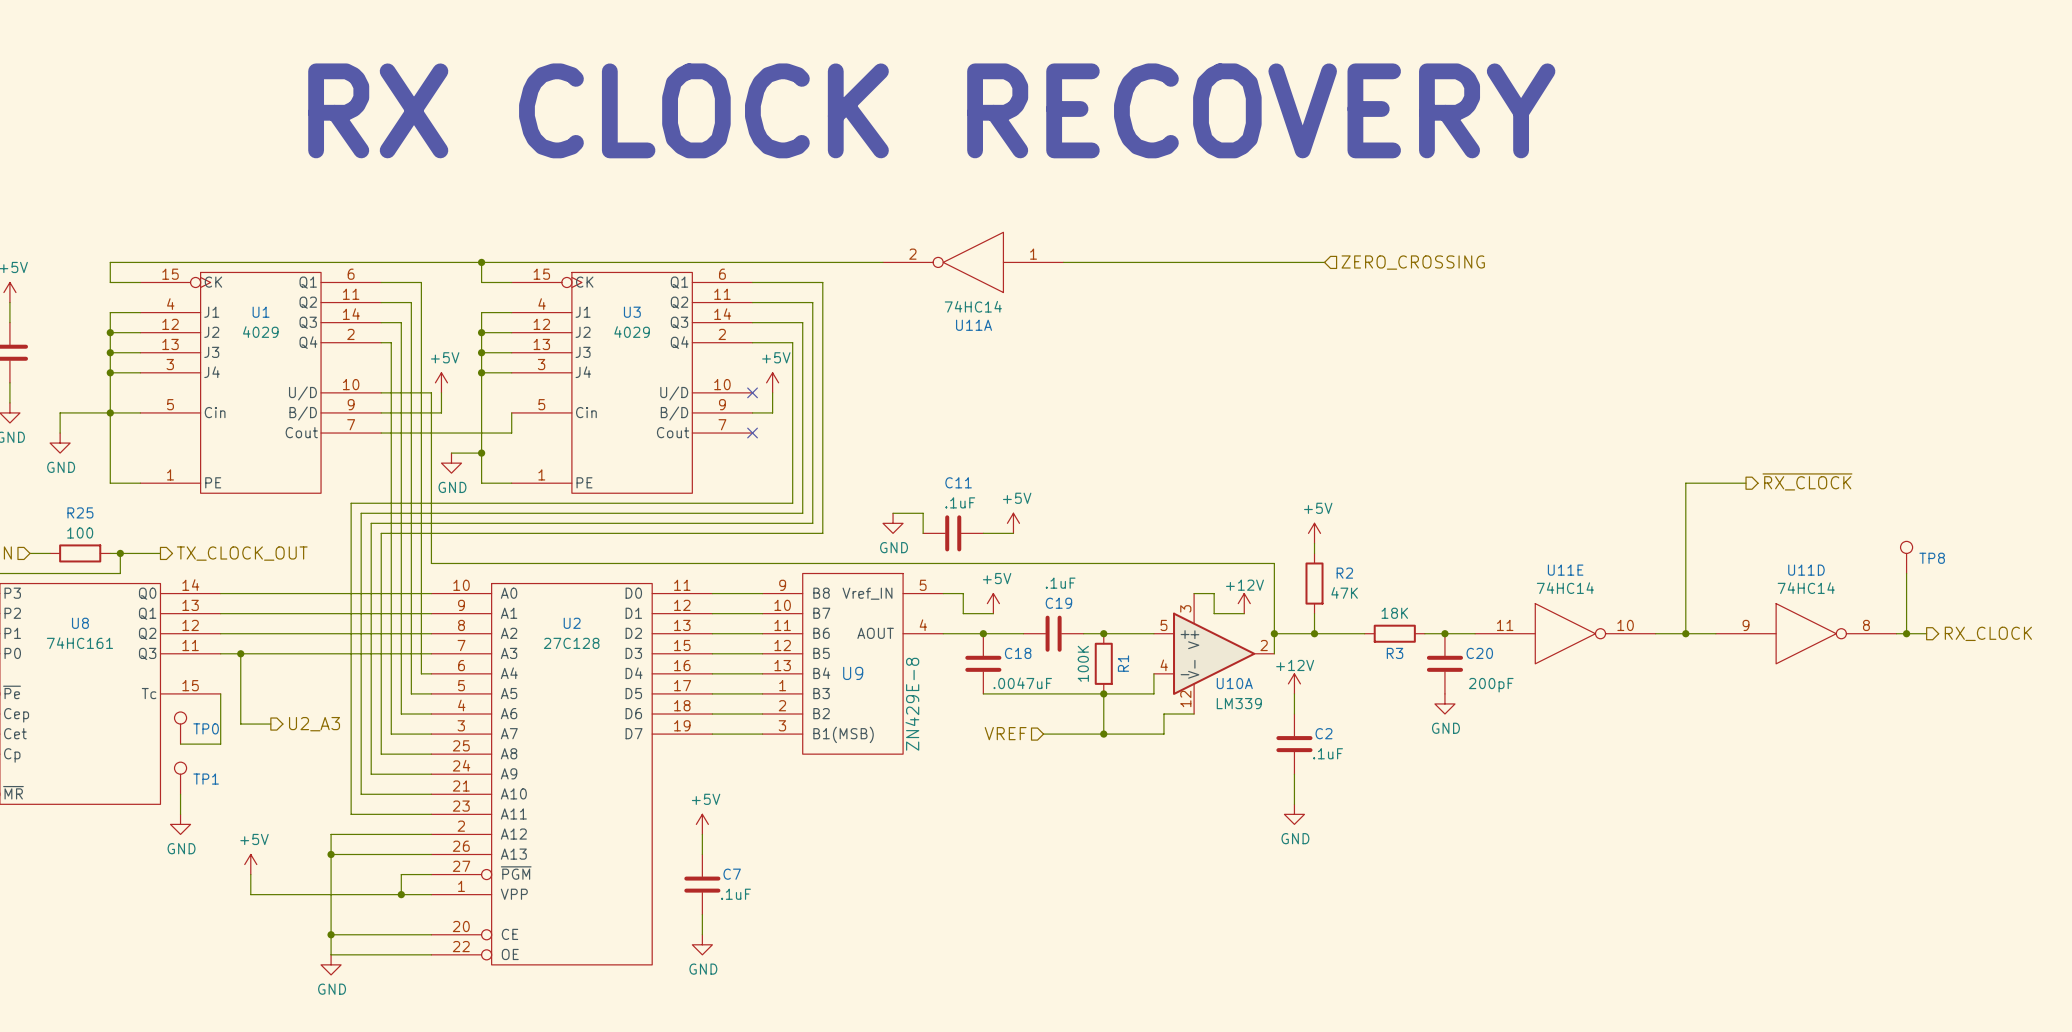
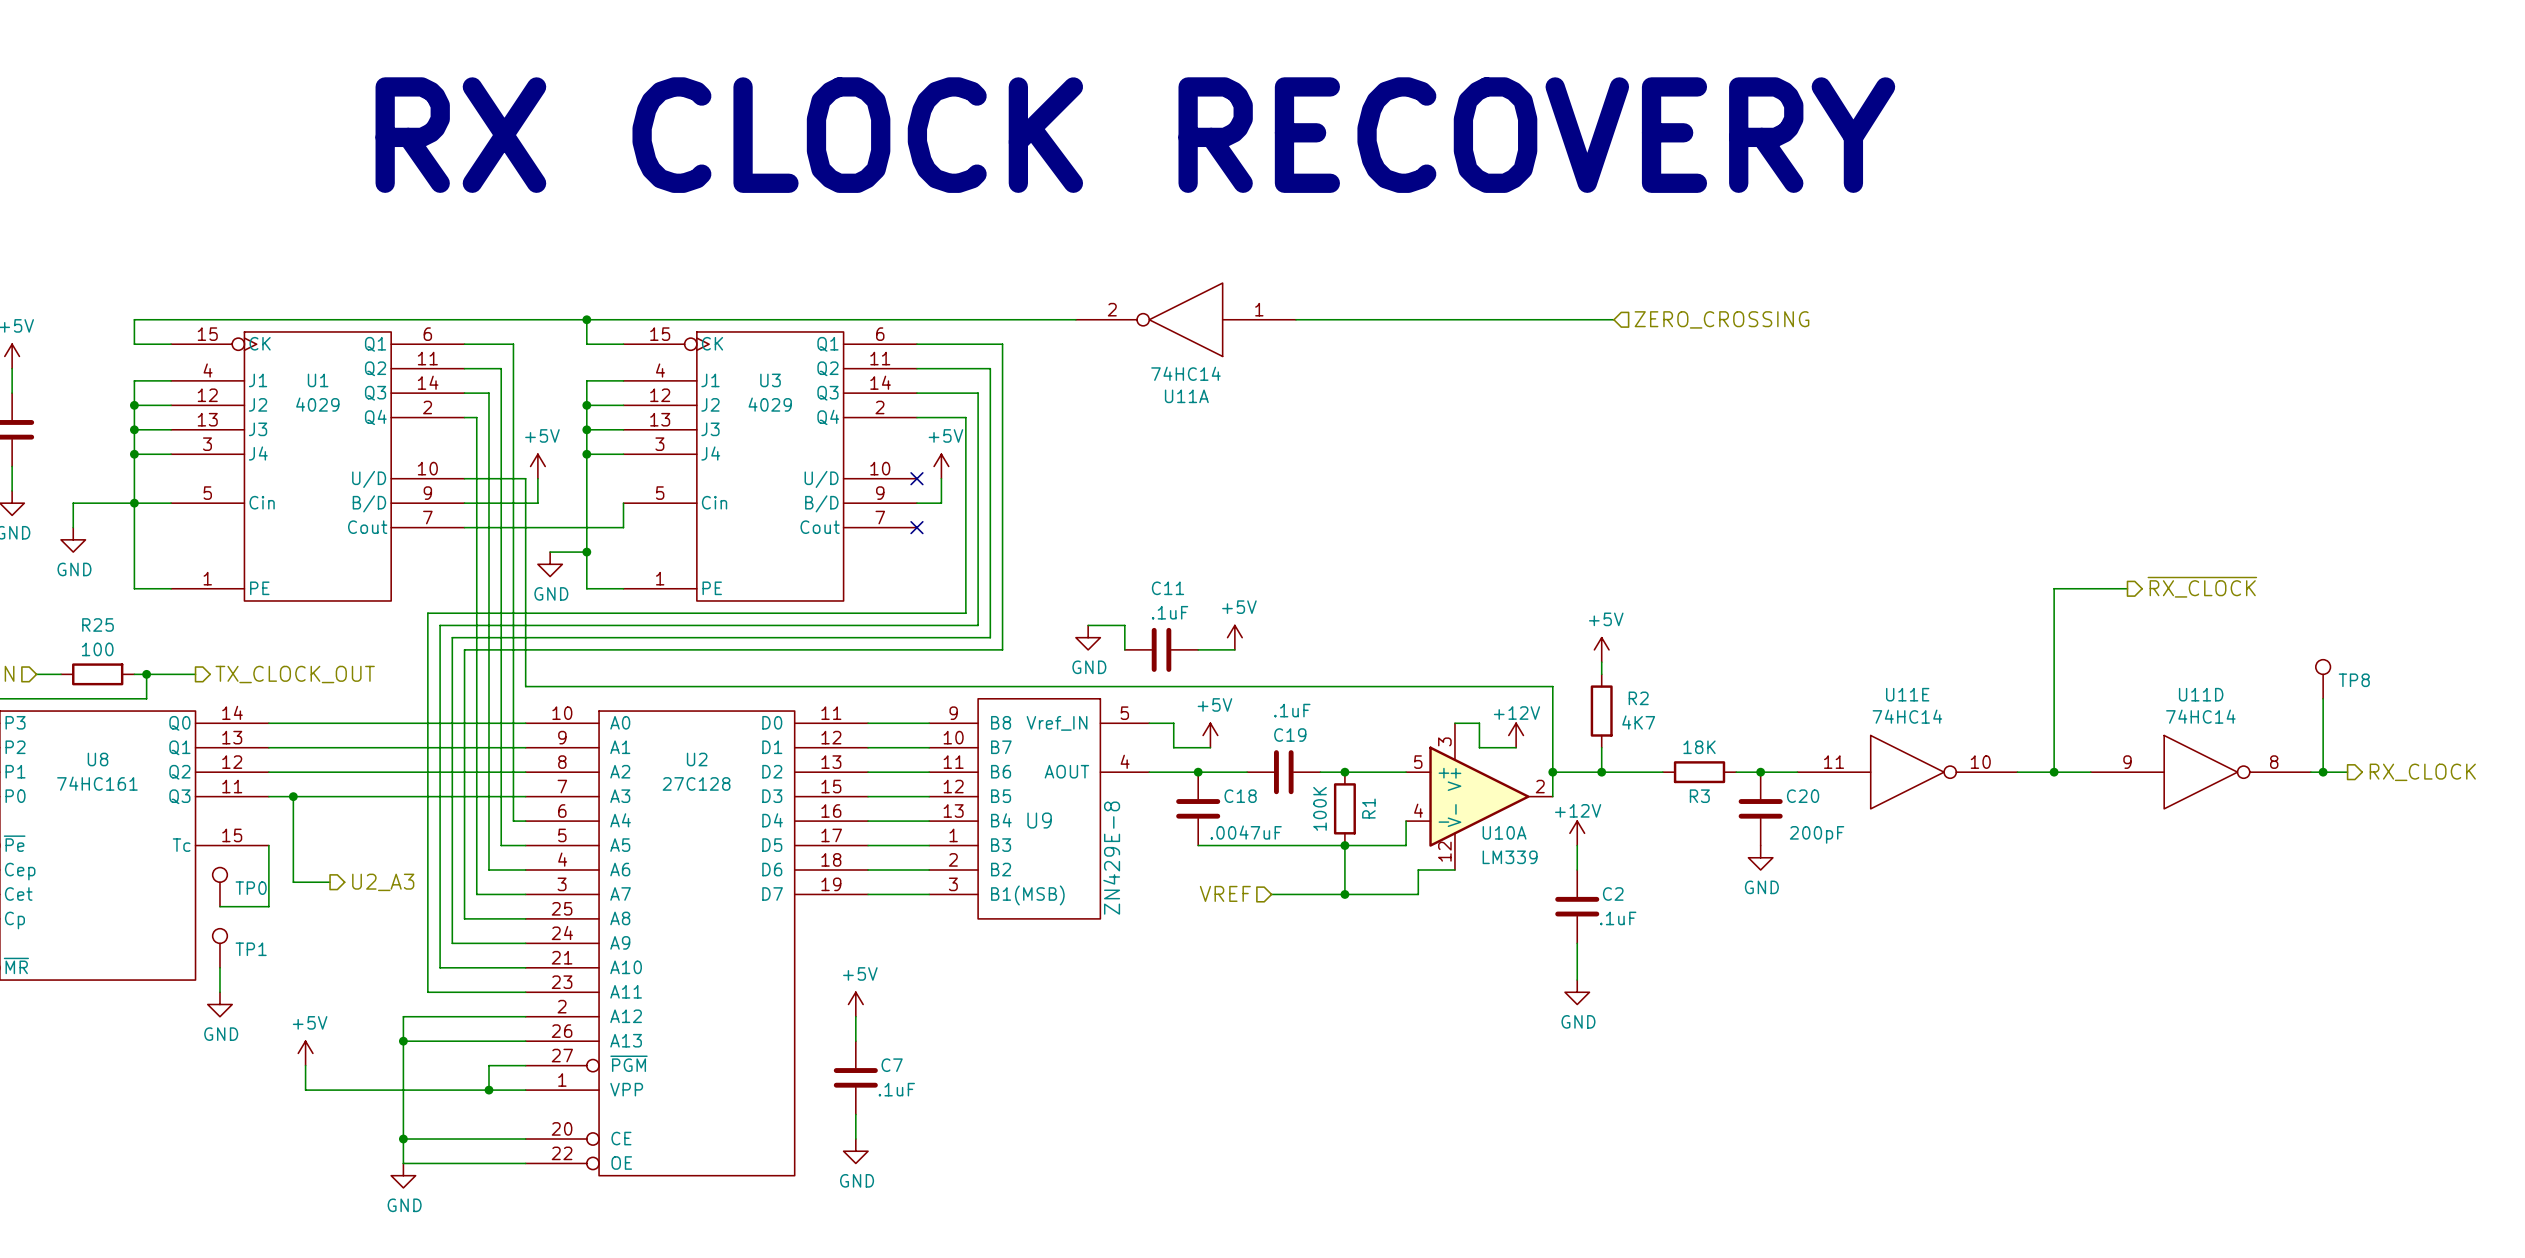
R2 value: 47K (1344, 592) -> 4K7 (1638, 722)

